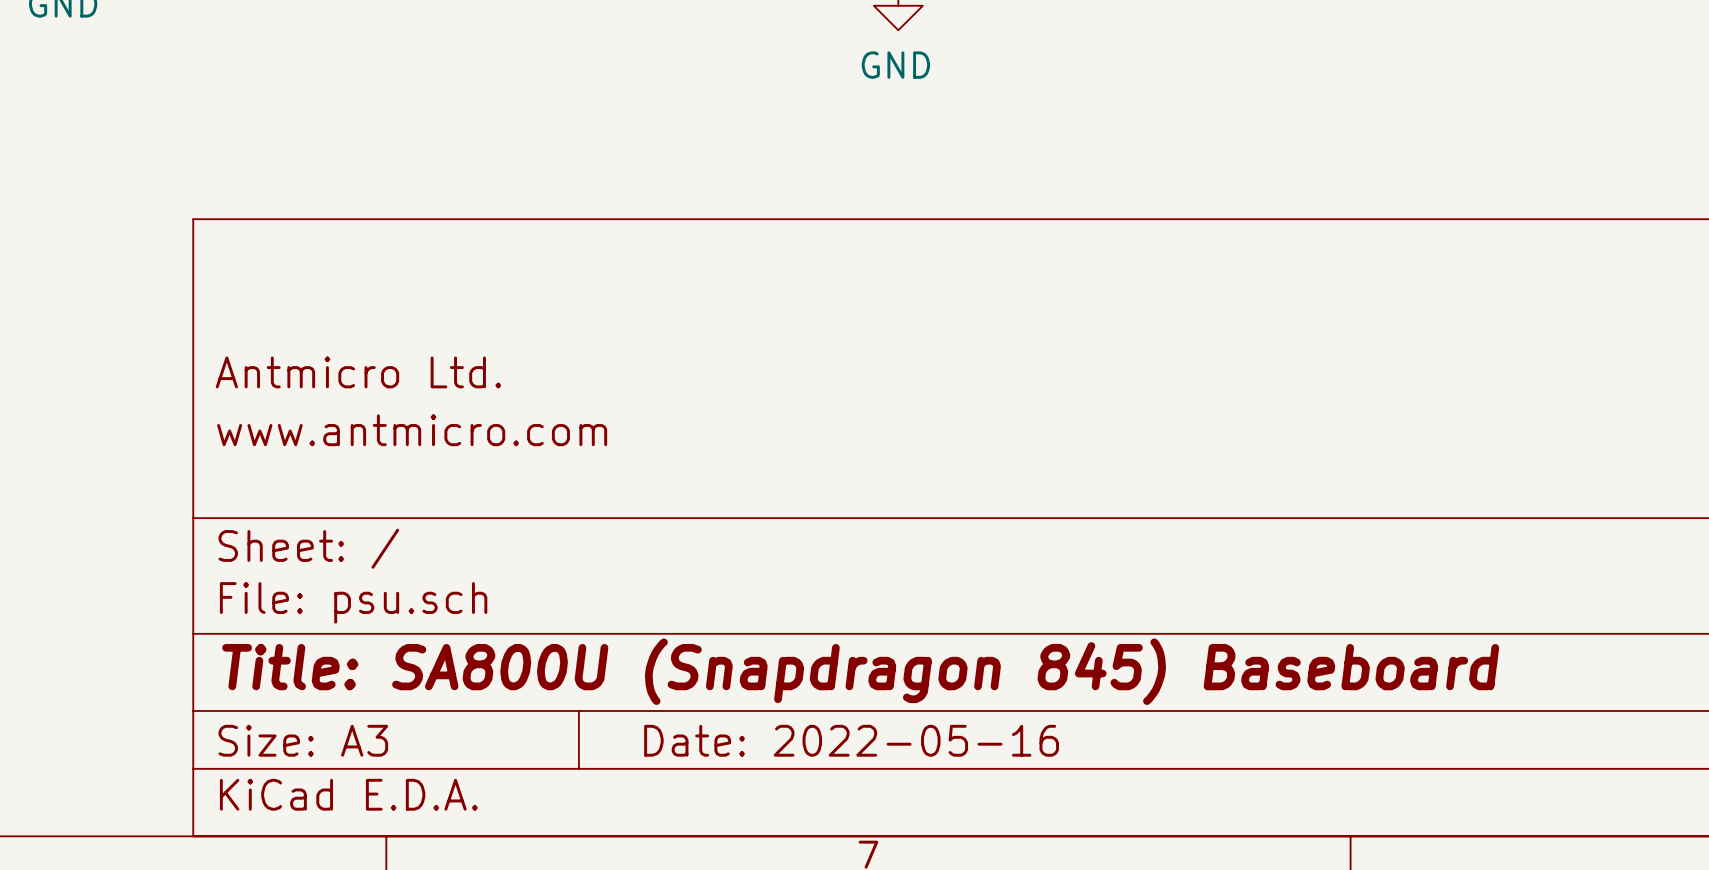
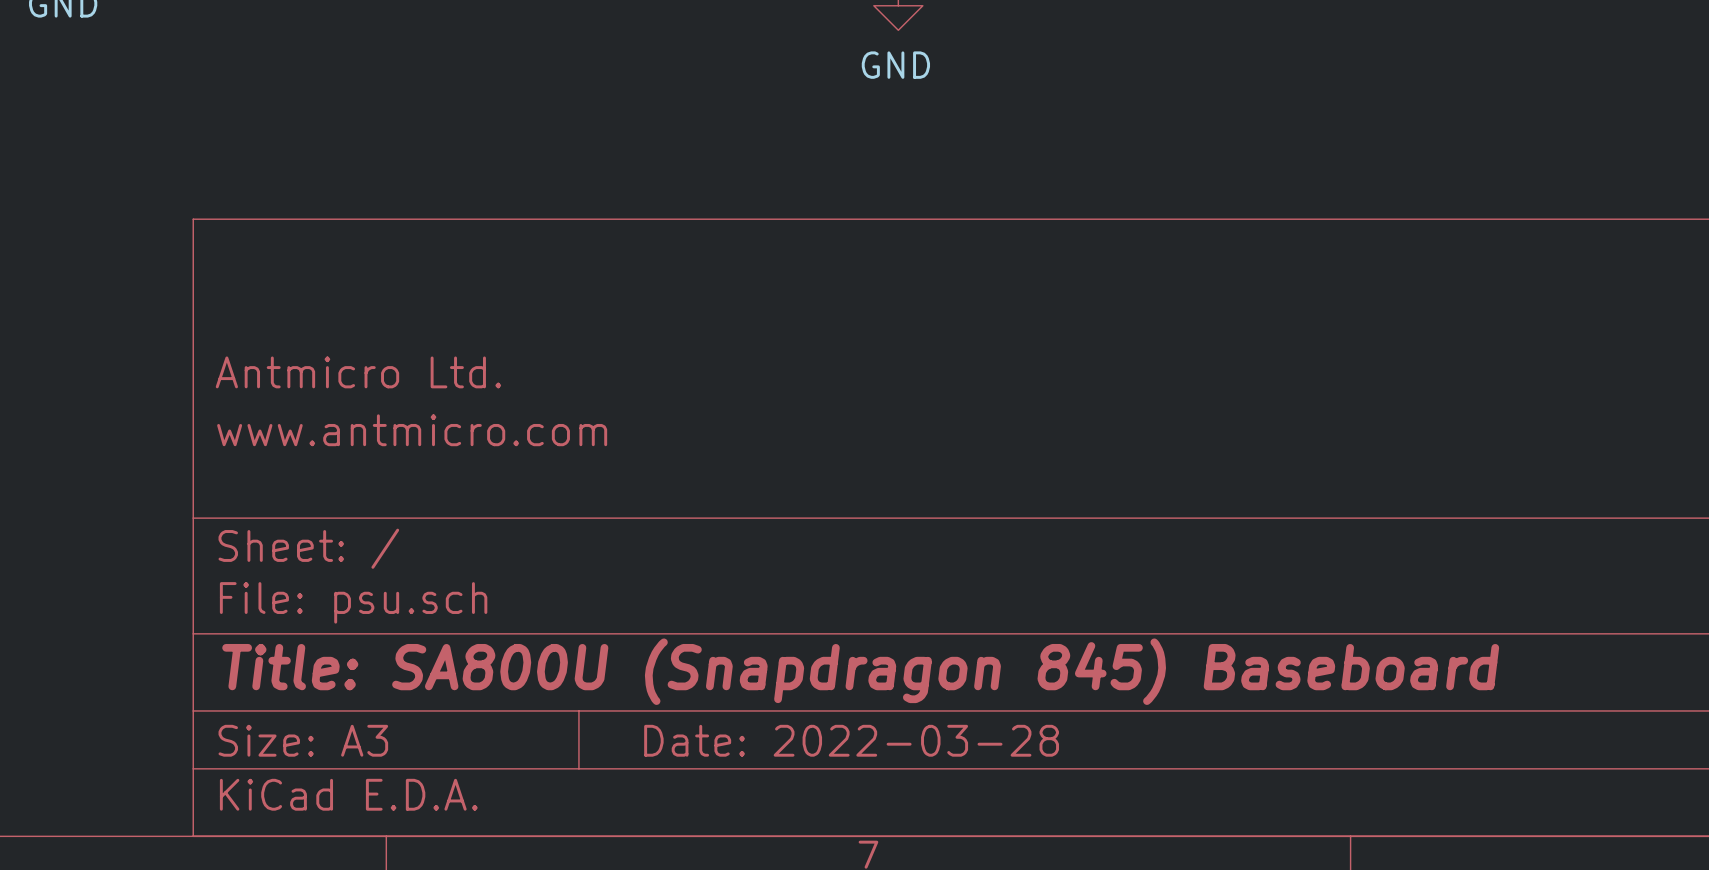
title block: Date: 2022-05-16 (851, 740) -> Date: 2022-03-28 (851, 740)

